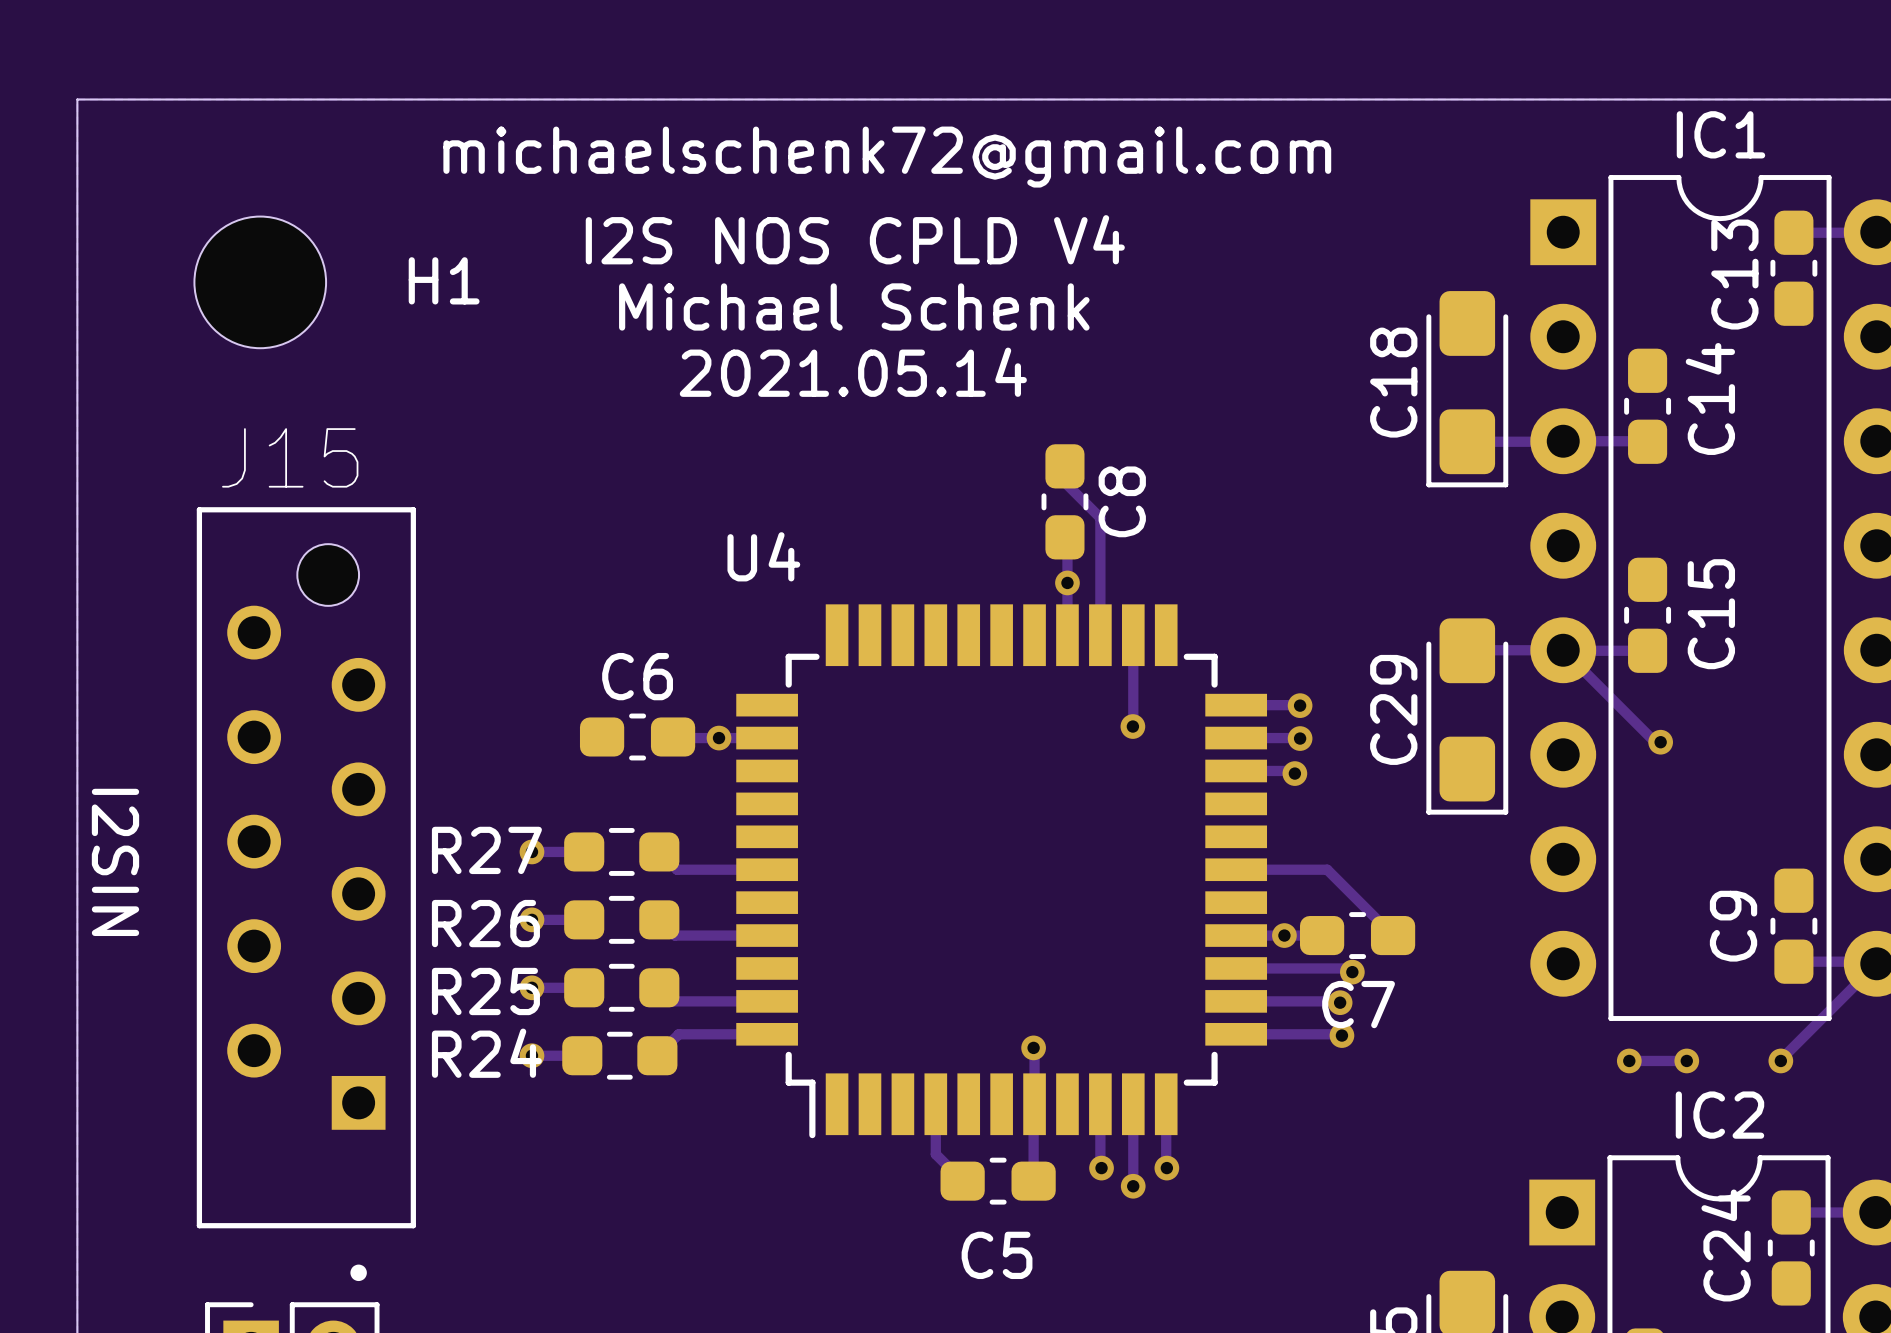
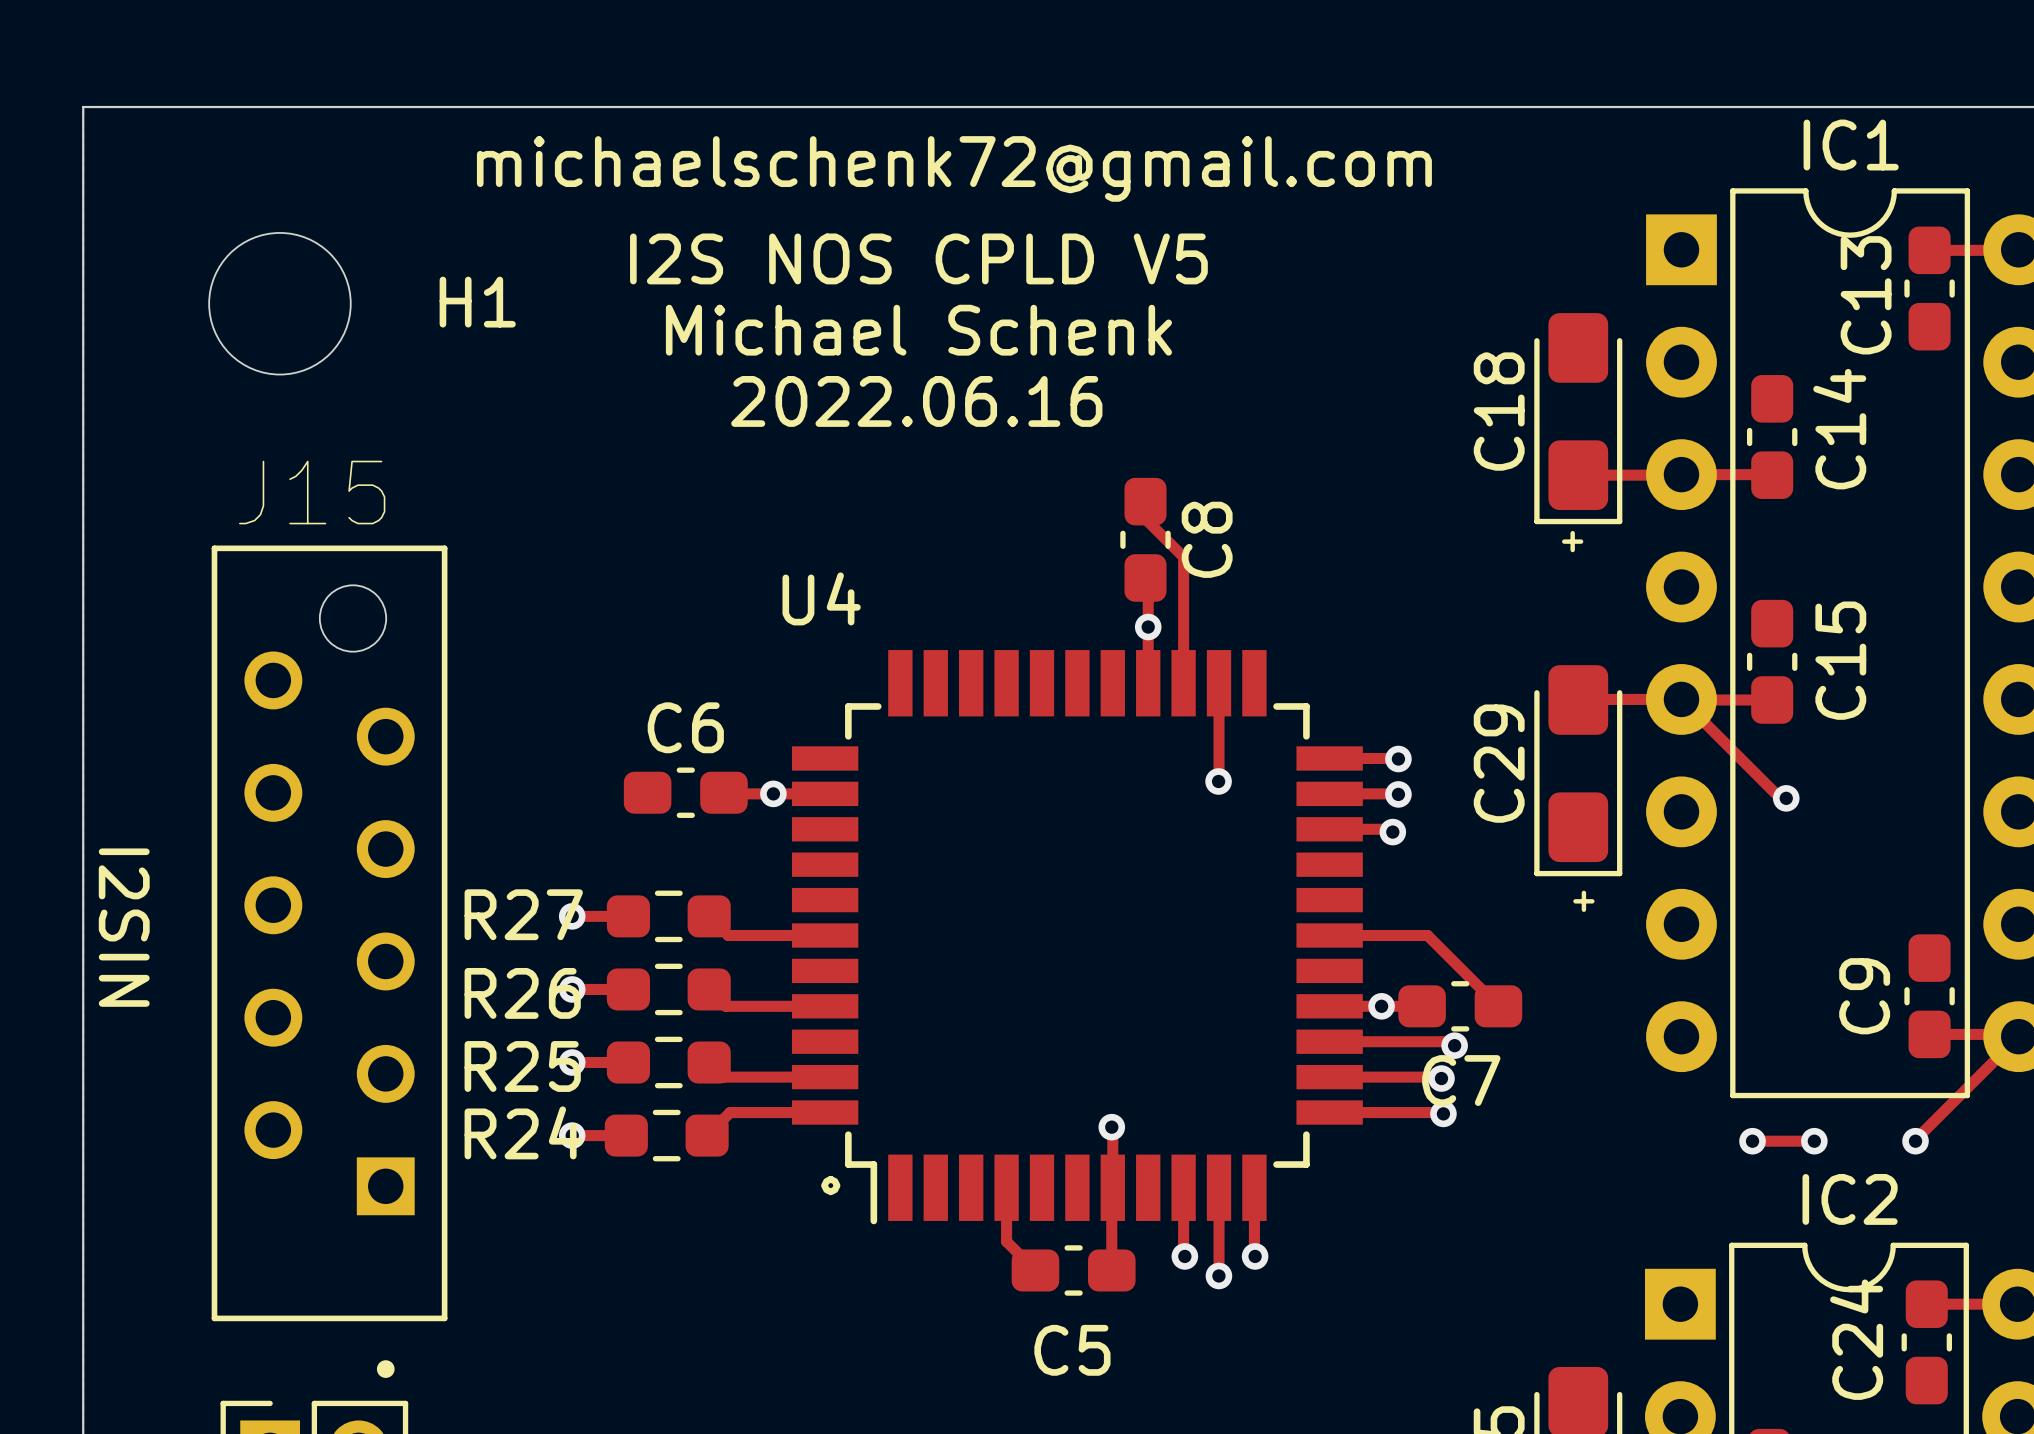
text: I2S NOS CPLD V4 (855, 239) -> I2S NOS CPLD V5 (918, 258)
text: 2021.05.14 (853, 372) -> 2022.06.16 (916, 401)
text: none -> + (1572, 541)
text: none -> + (1583, 901)
text: none -> ° (830, 1185)

